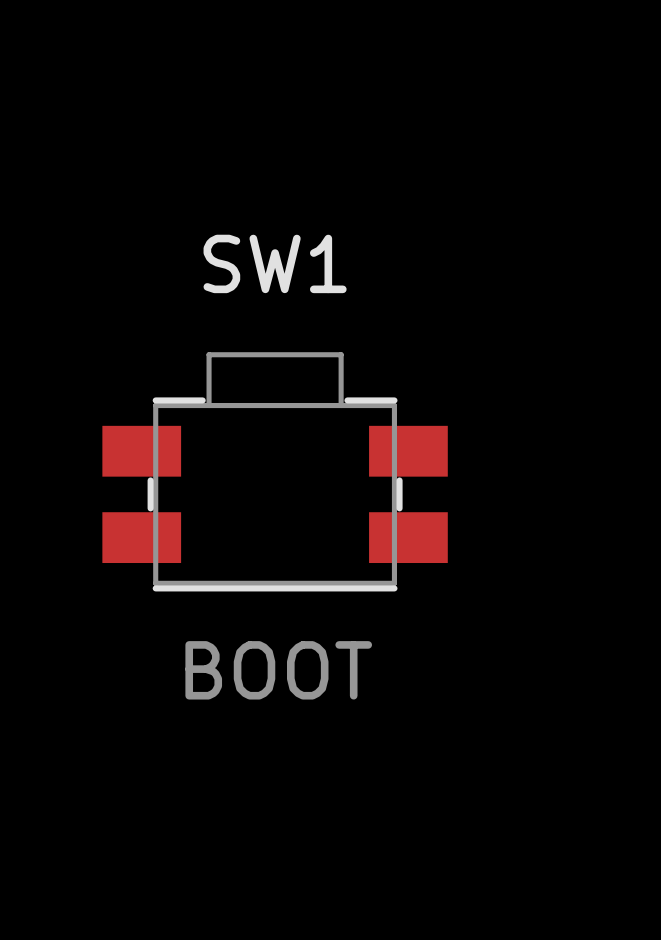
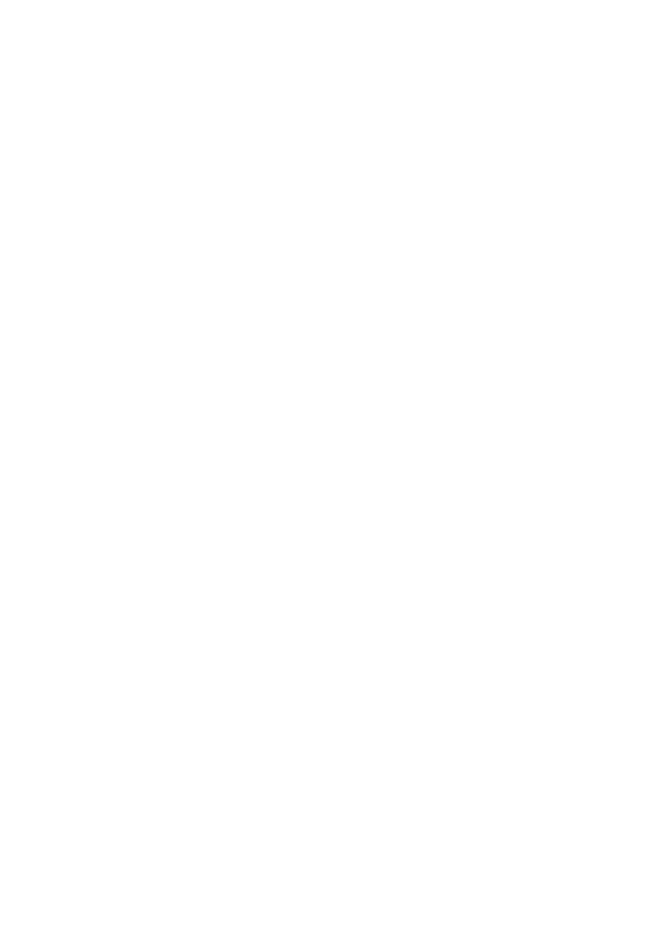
SW1: BOOT (275, 471) -> none

